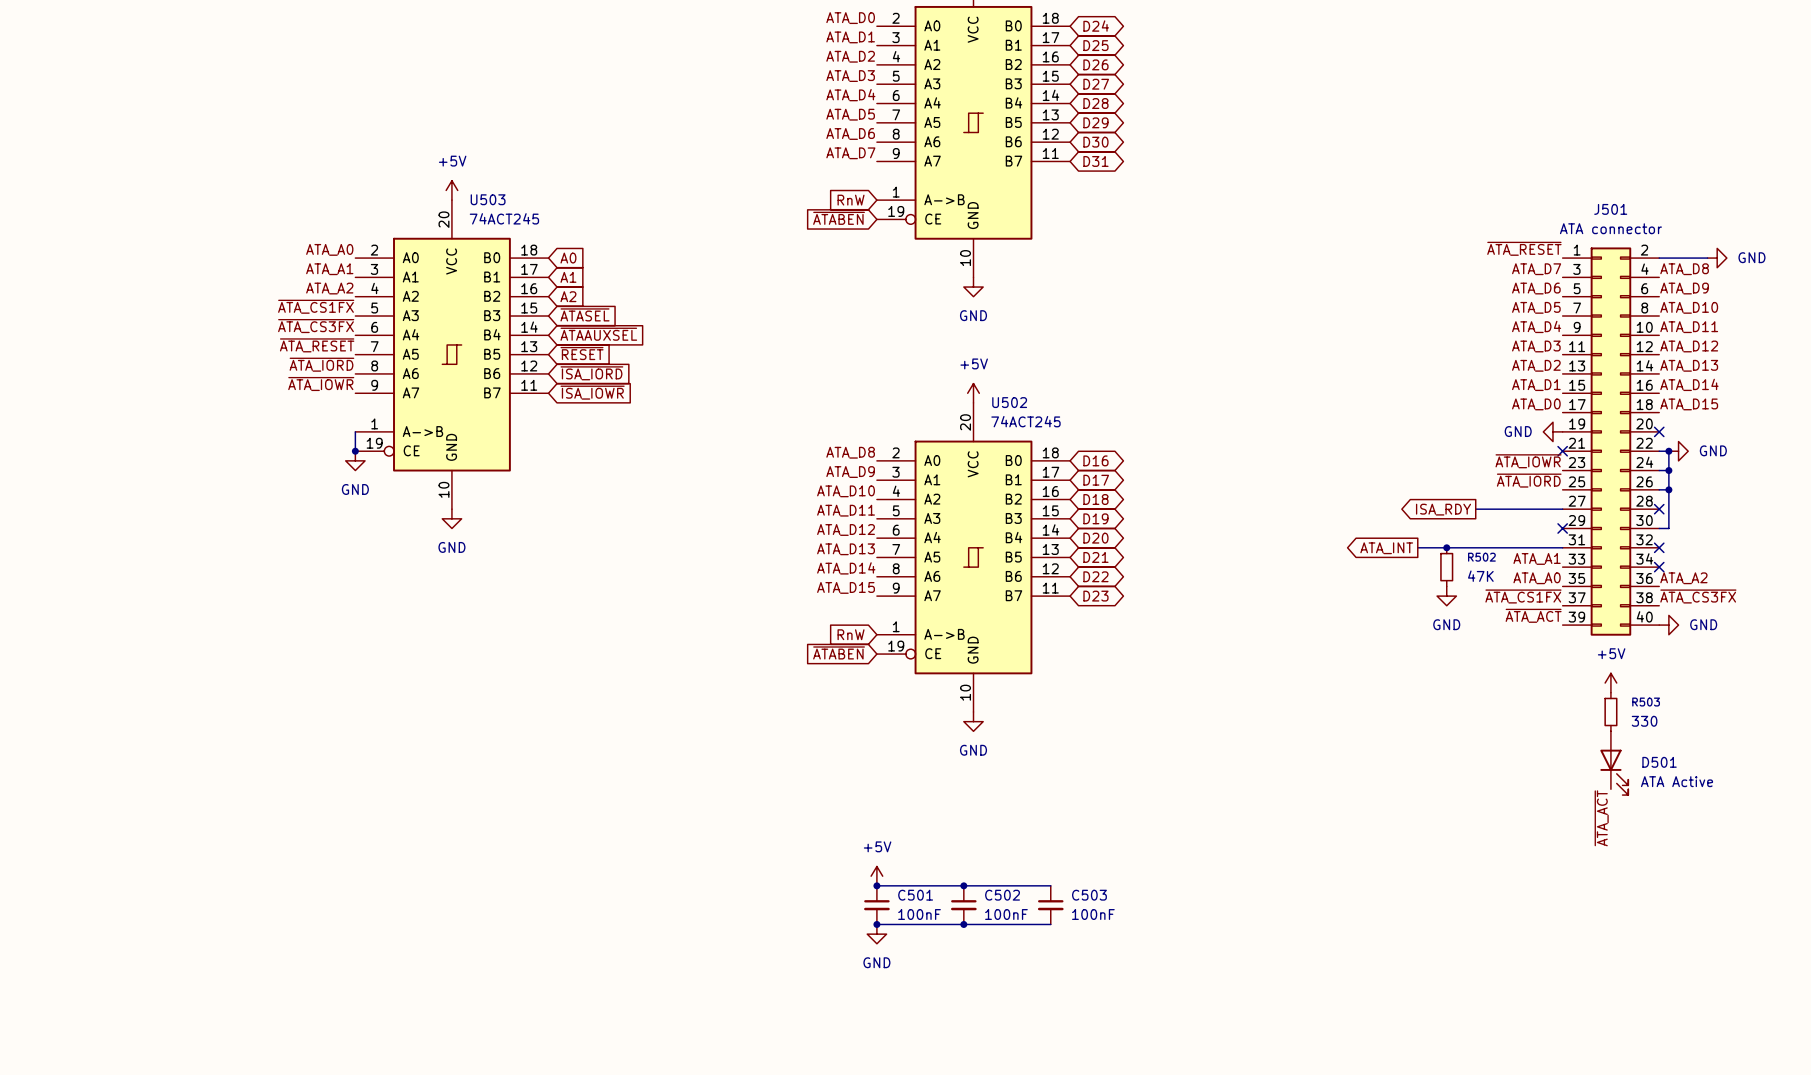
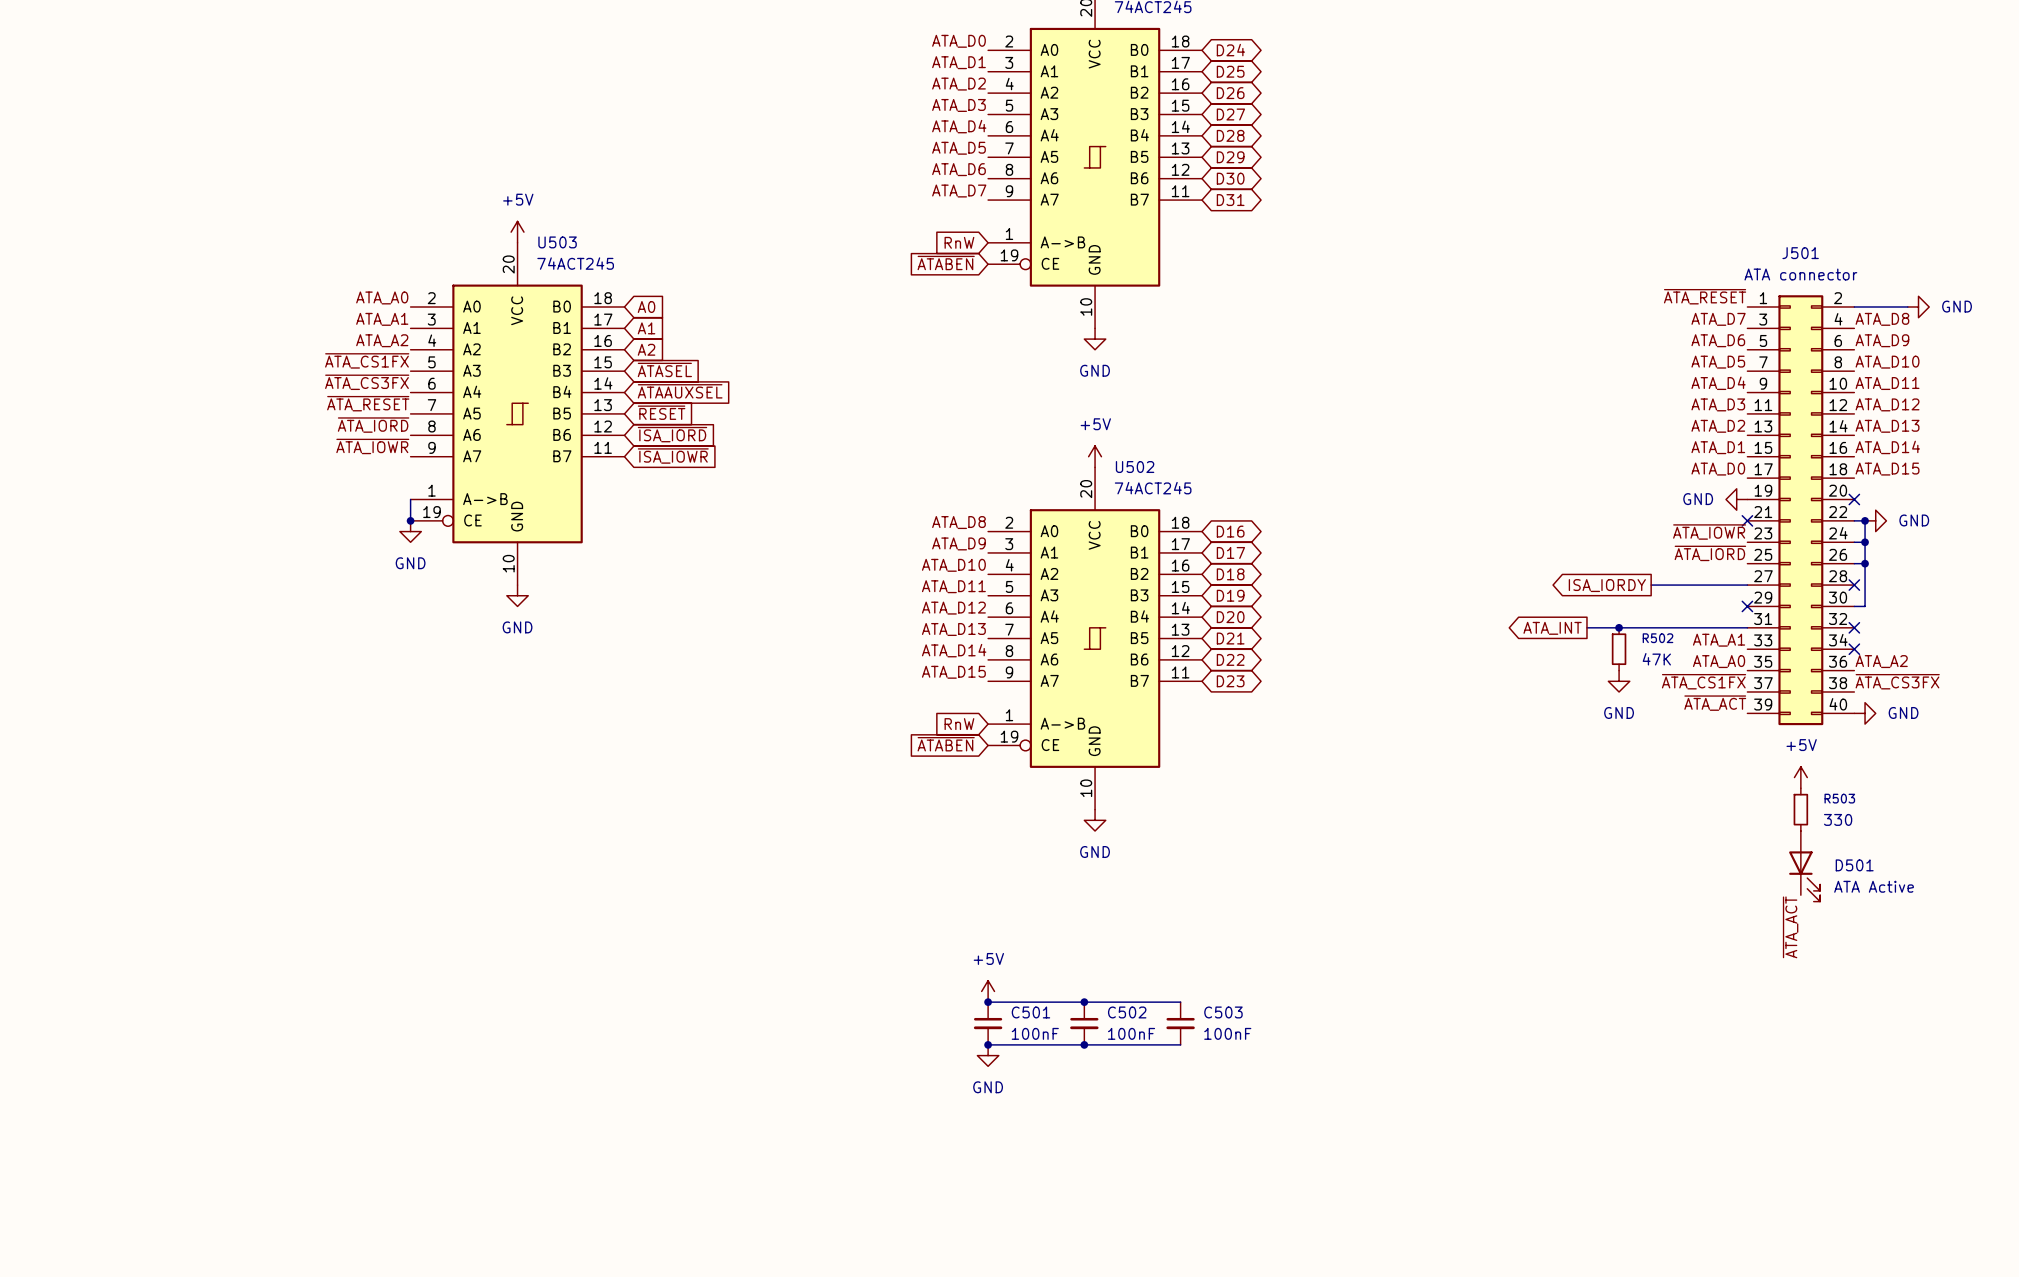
global label: ISA_RDY (1443, 509) -> ISA_IORDY (1607, 585)

